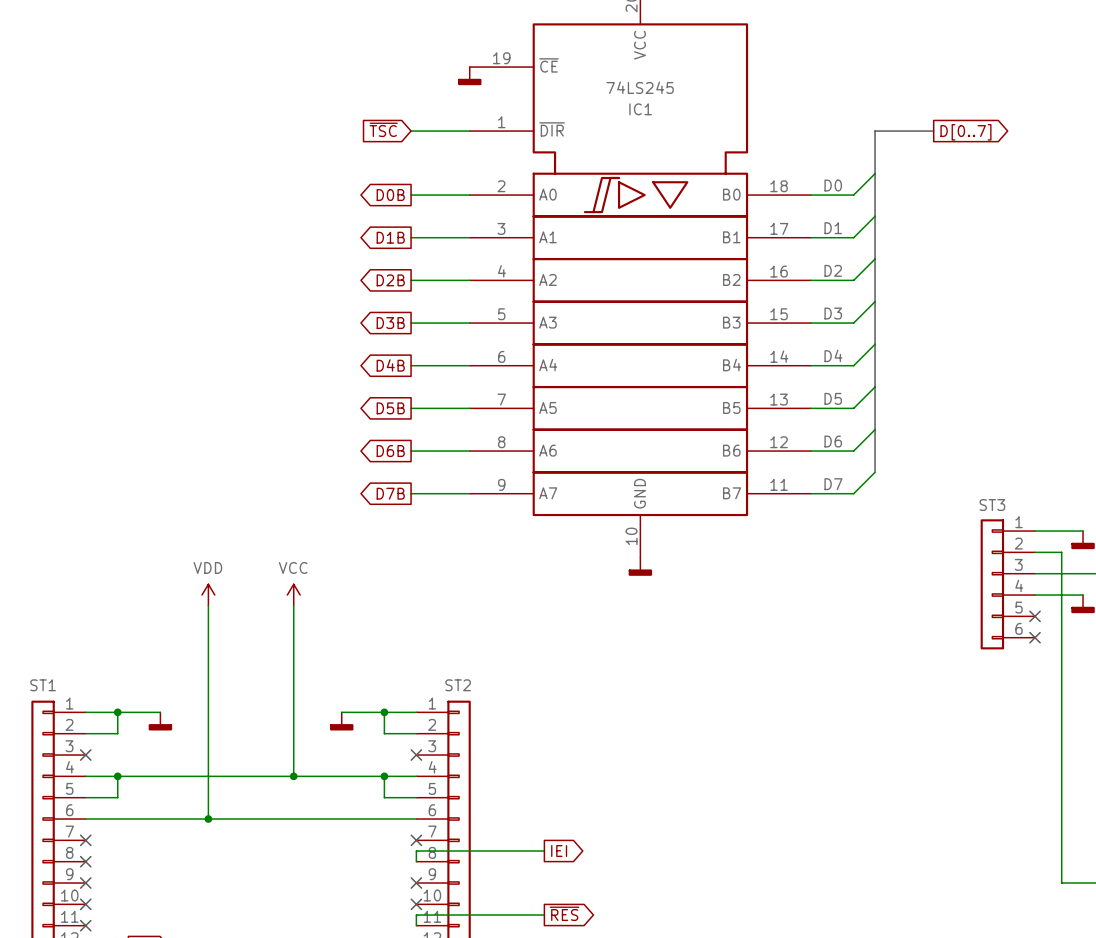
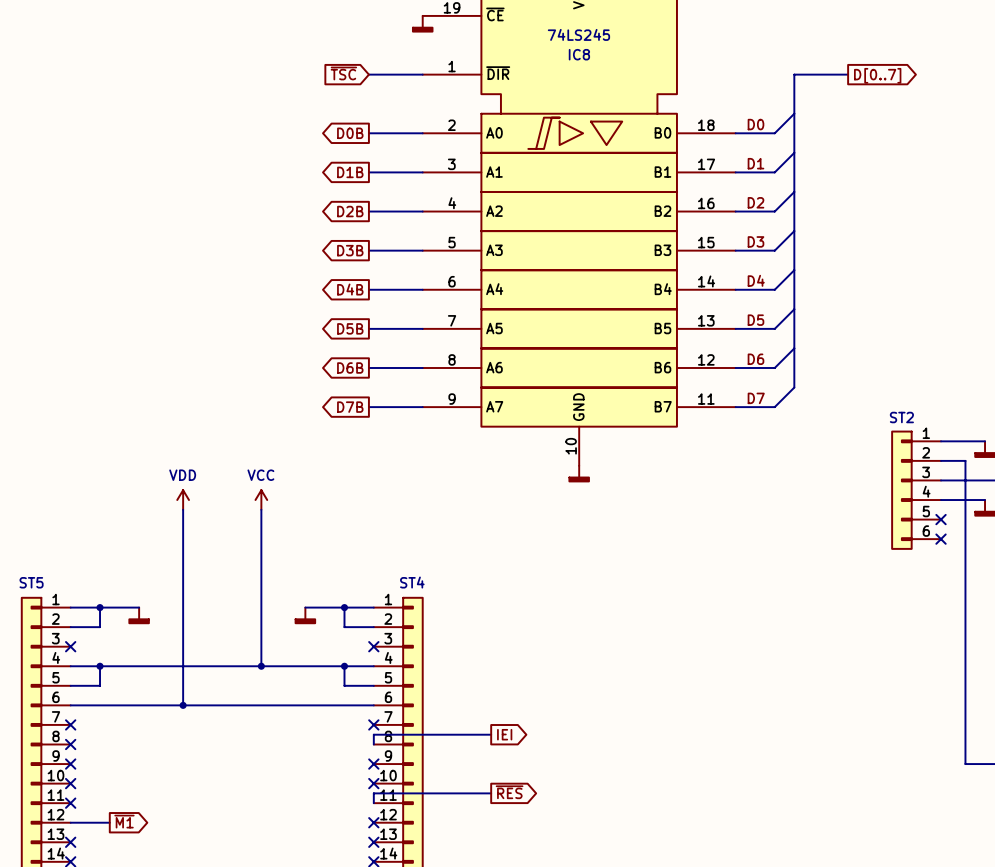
IC1 name: IC1 (640, 109) -> IC8 (579, 54)
ST3 name: ST3 (992, 505) -> ST2 (901, 417)
ST1 name: ST1 (43, 685) -> ST5 (31, 582)
ST2 name: ST2 (458, 685) -> ST4 (412, 582)

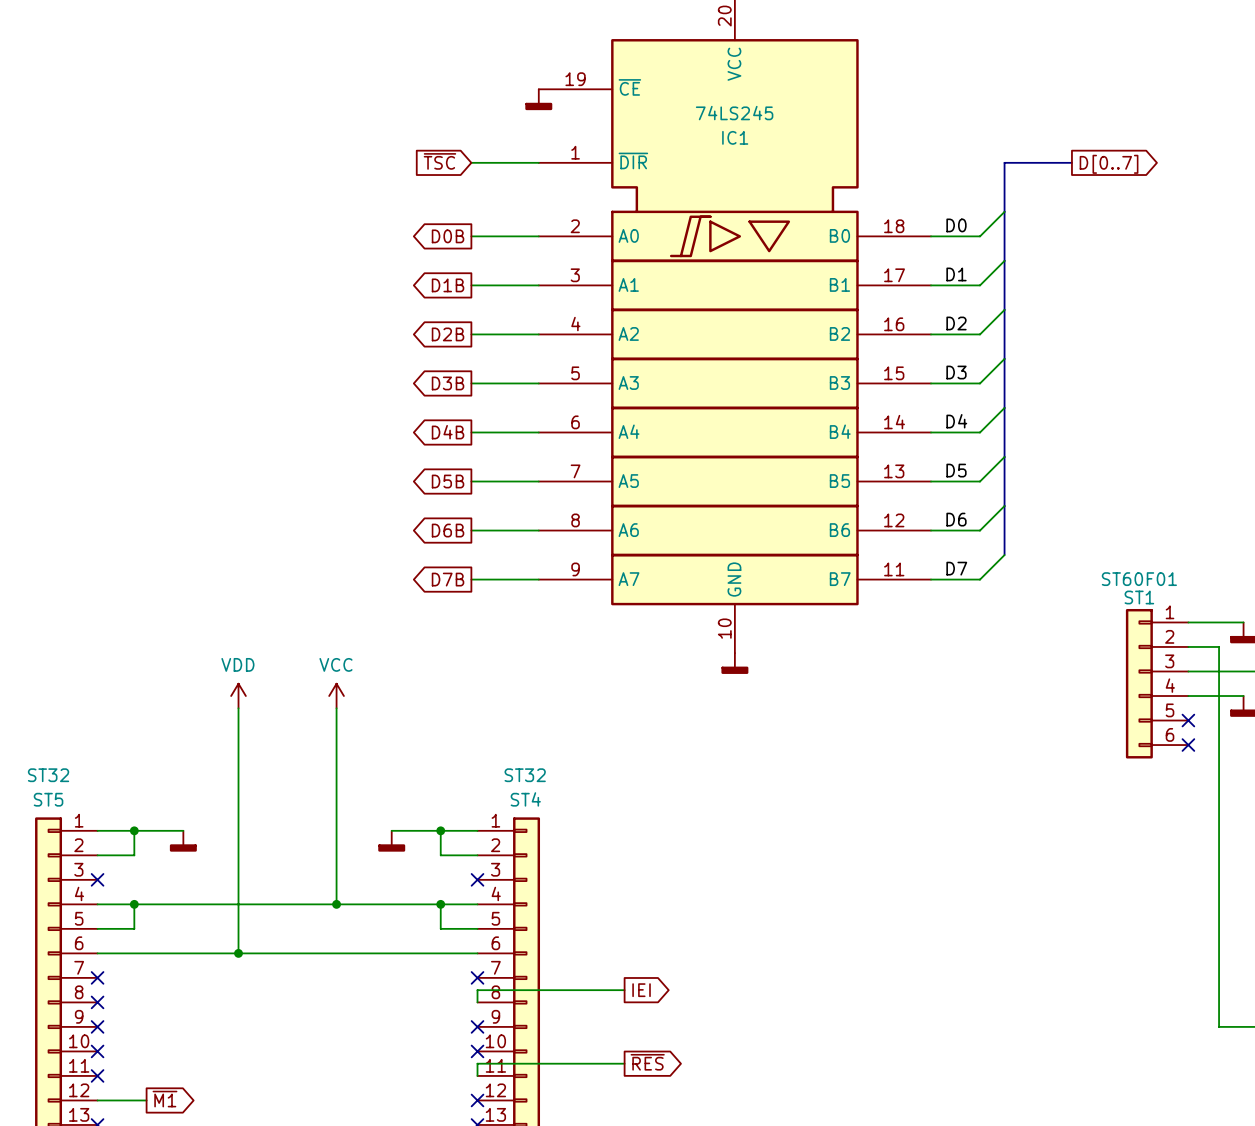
IC8 name: IC8 (579, 54) -> IC1 (735, 137)
ST2 value: none -> ST60F01 (1139, 579)
ST2 name: ST2 (901, 417) -> ST1 (1139, 597)
ST5 value: none -> ST32 (48, 775)
ST4 value: none -> ST32 (525, 775)

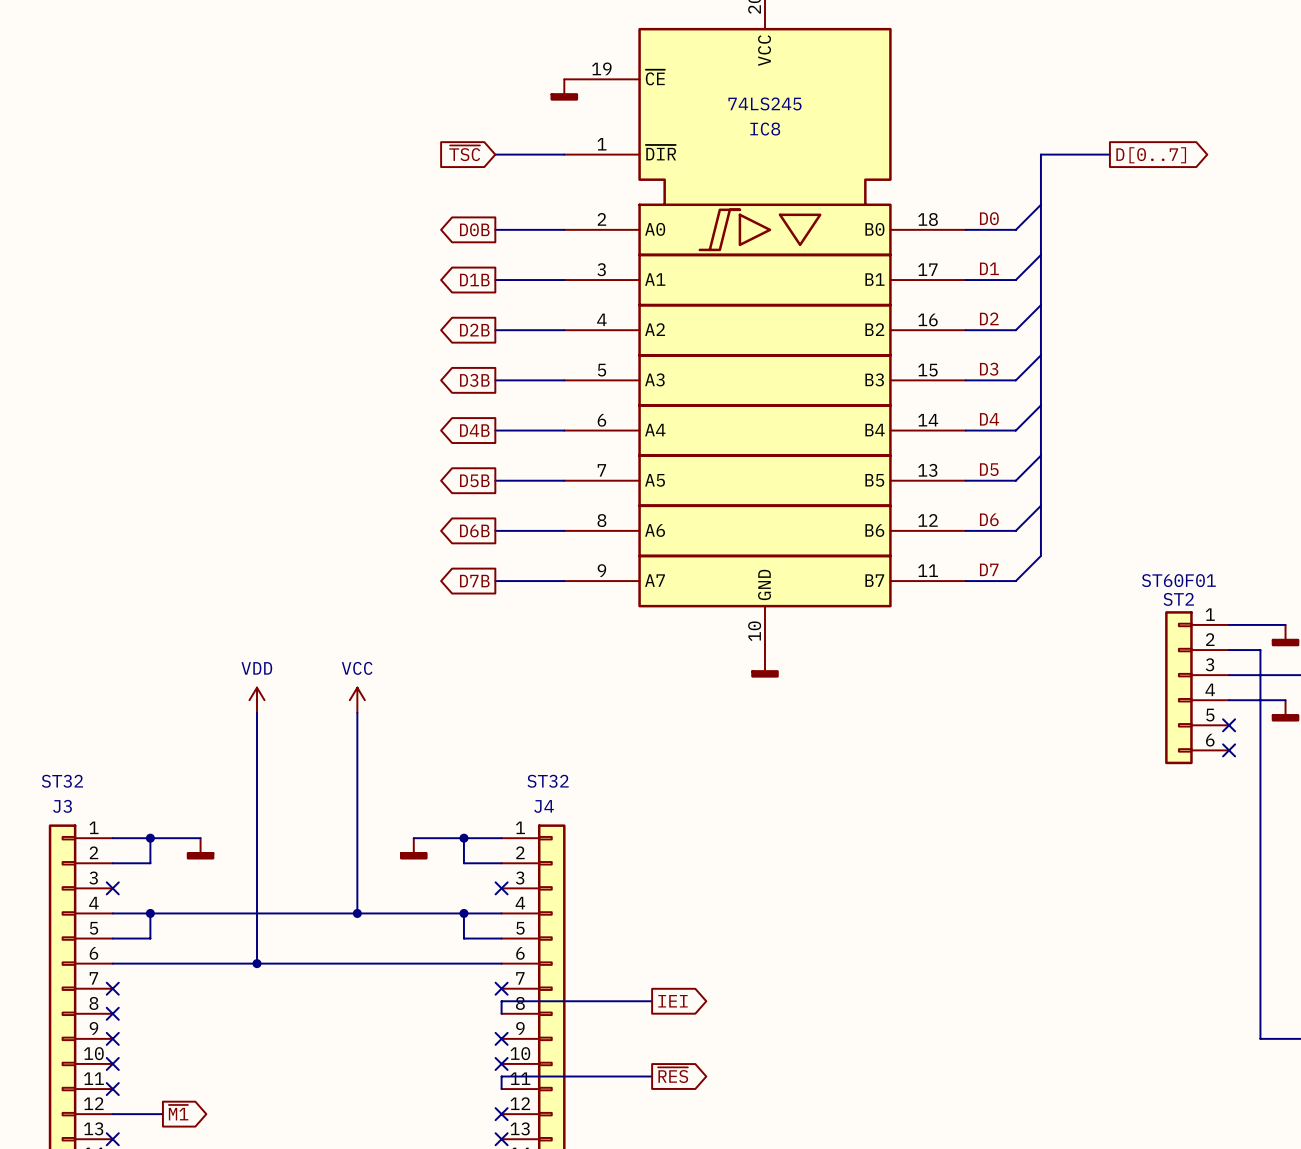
IC1 name: IC1 (735, 137) -> IC8 (765, 129)
ST1 name: ST1 (1139, 597) -> ST2 (1178, 599)
ST5 name: ST5 (48, 799) -> J3 (62, 806)
ST4 name: ST4 (525, 799) -> J4 (544, 806)

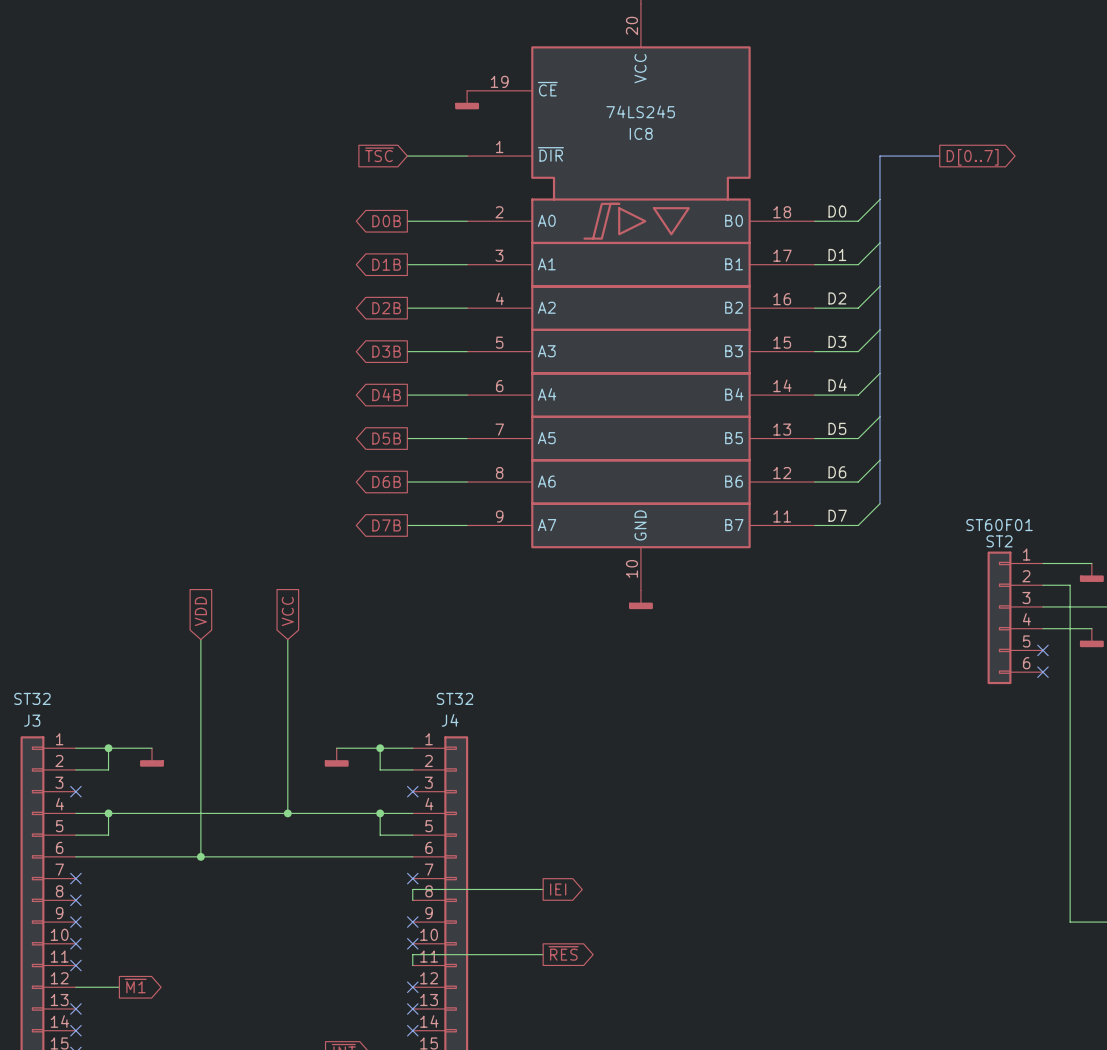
global label: none -> VDD (200, 611)
global label: none -> VCC (287, 611)
power symbol: VDD (257, 700) -> none
power symbol: VCC (357, 700) -> none

